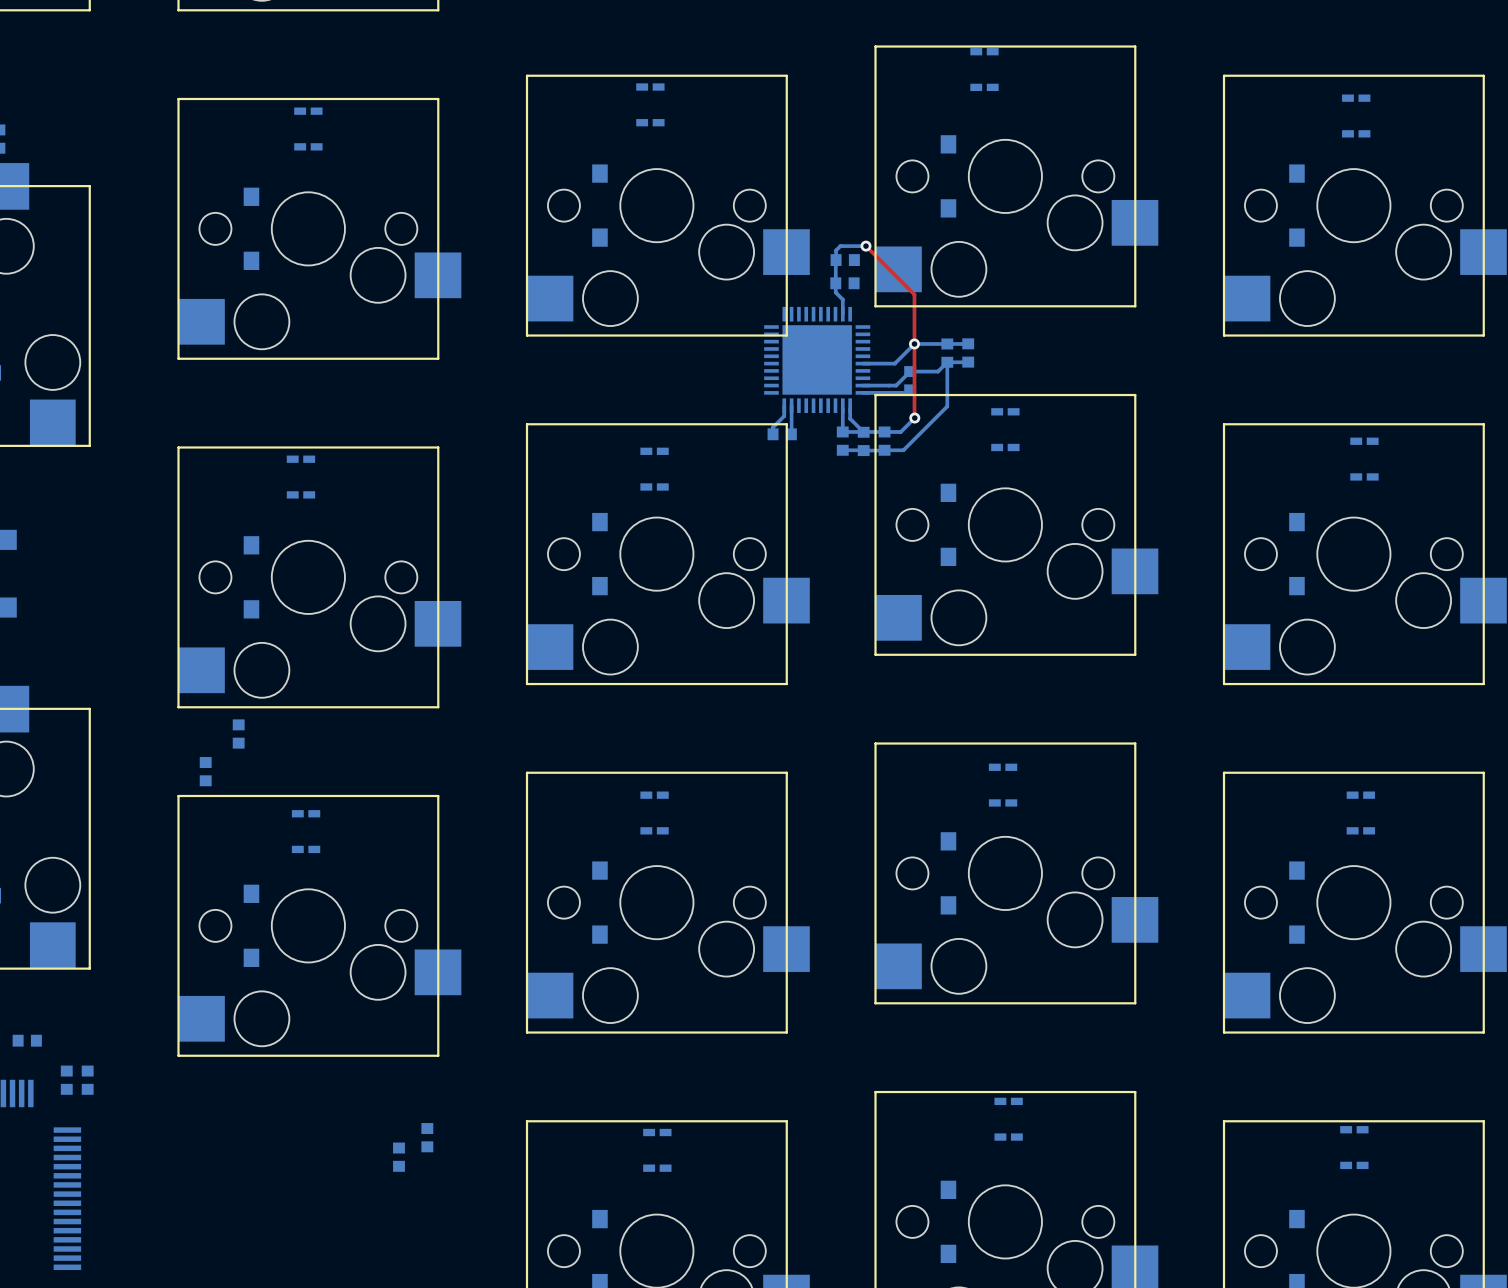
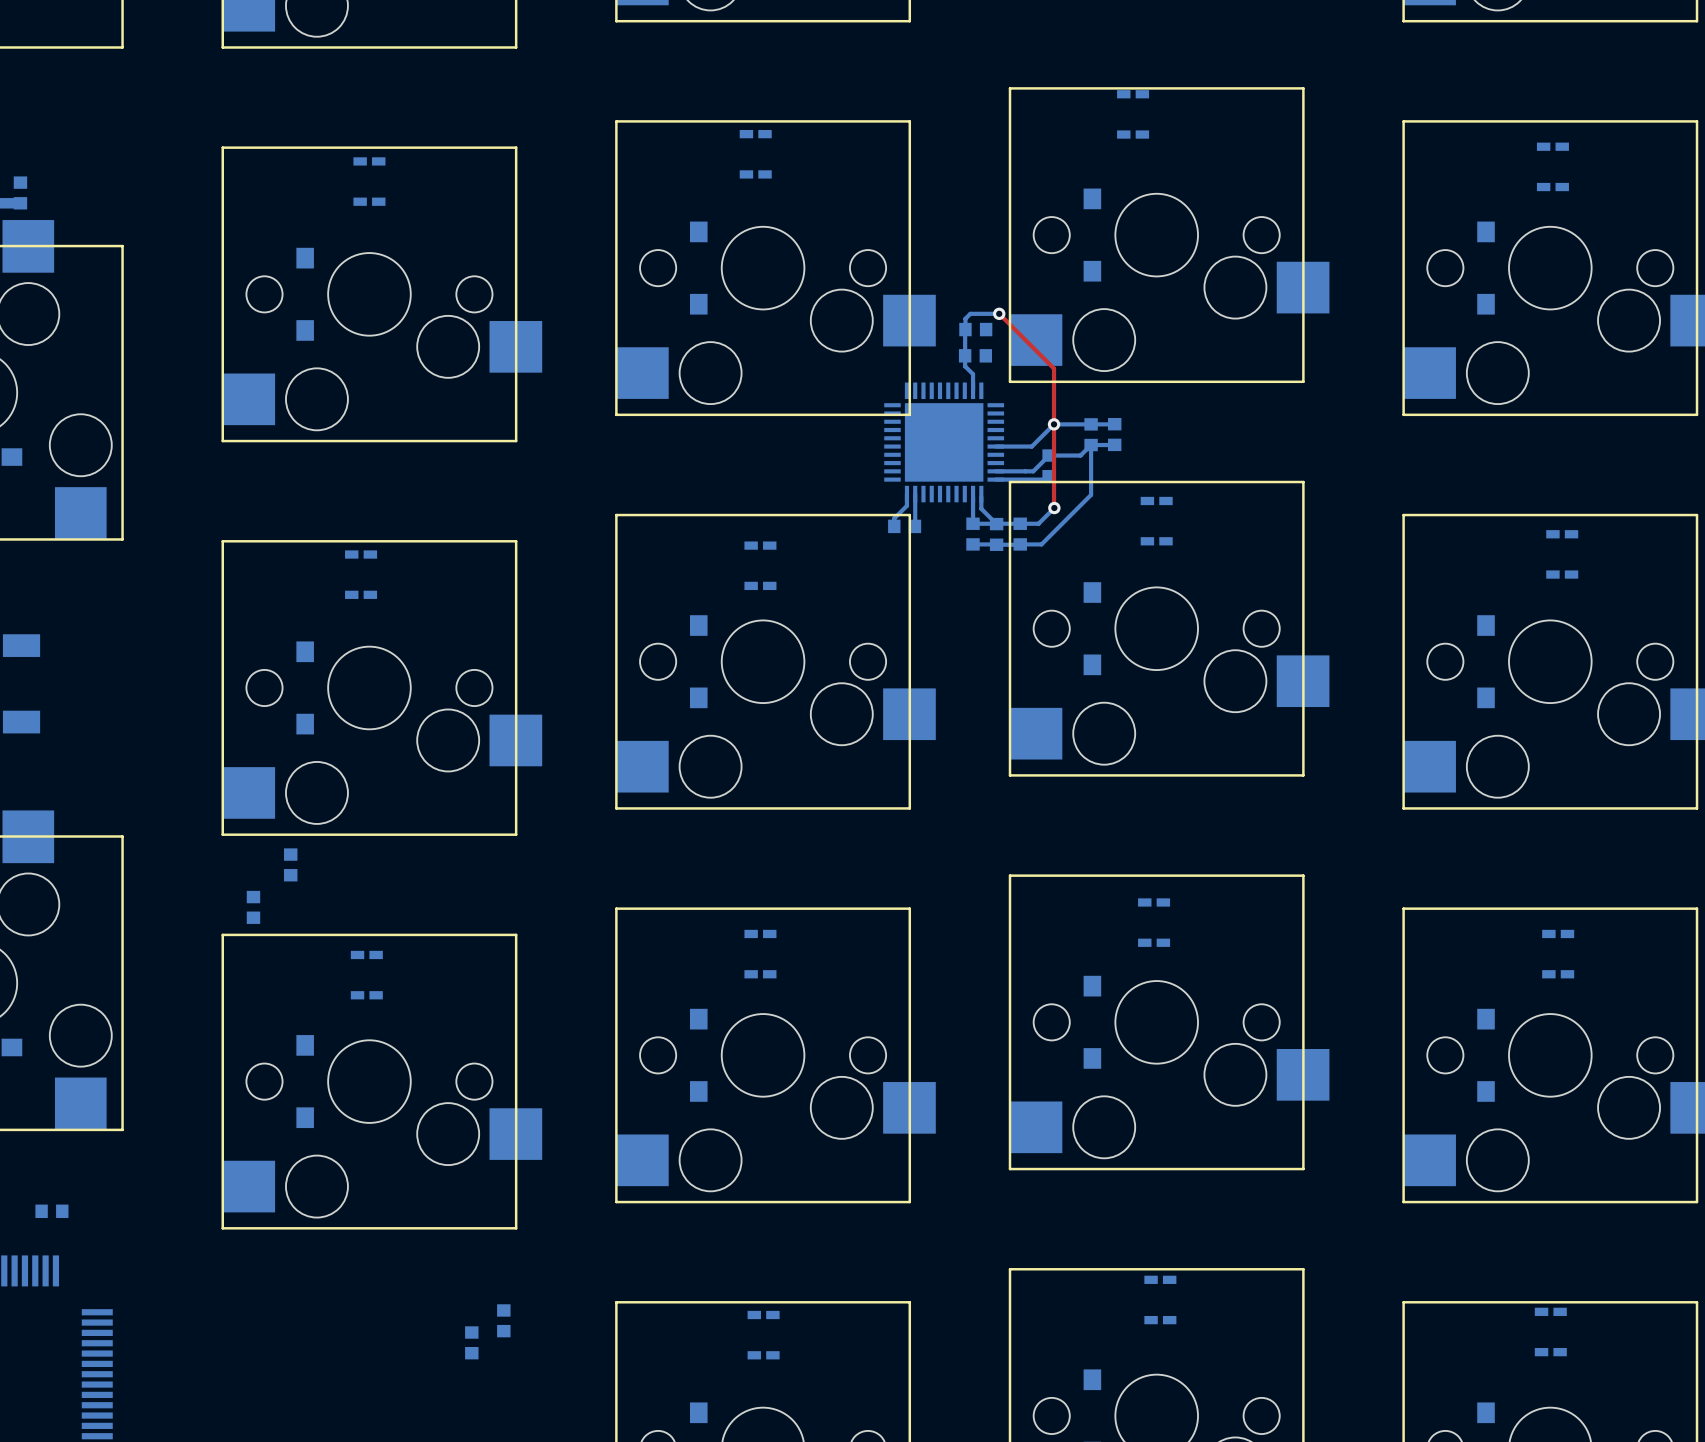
part: (66, 1080) -> none
part: (87, 1080) -> none

